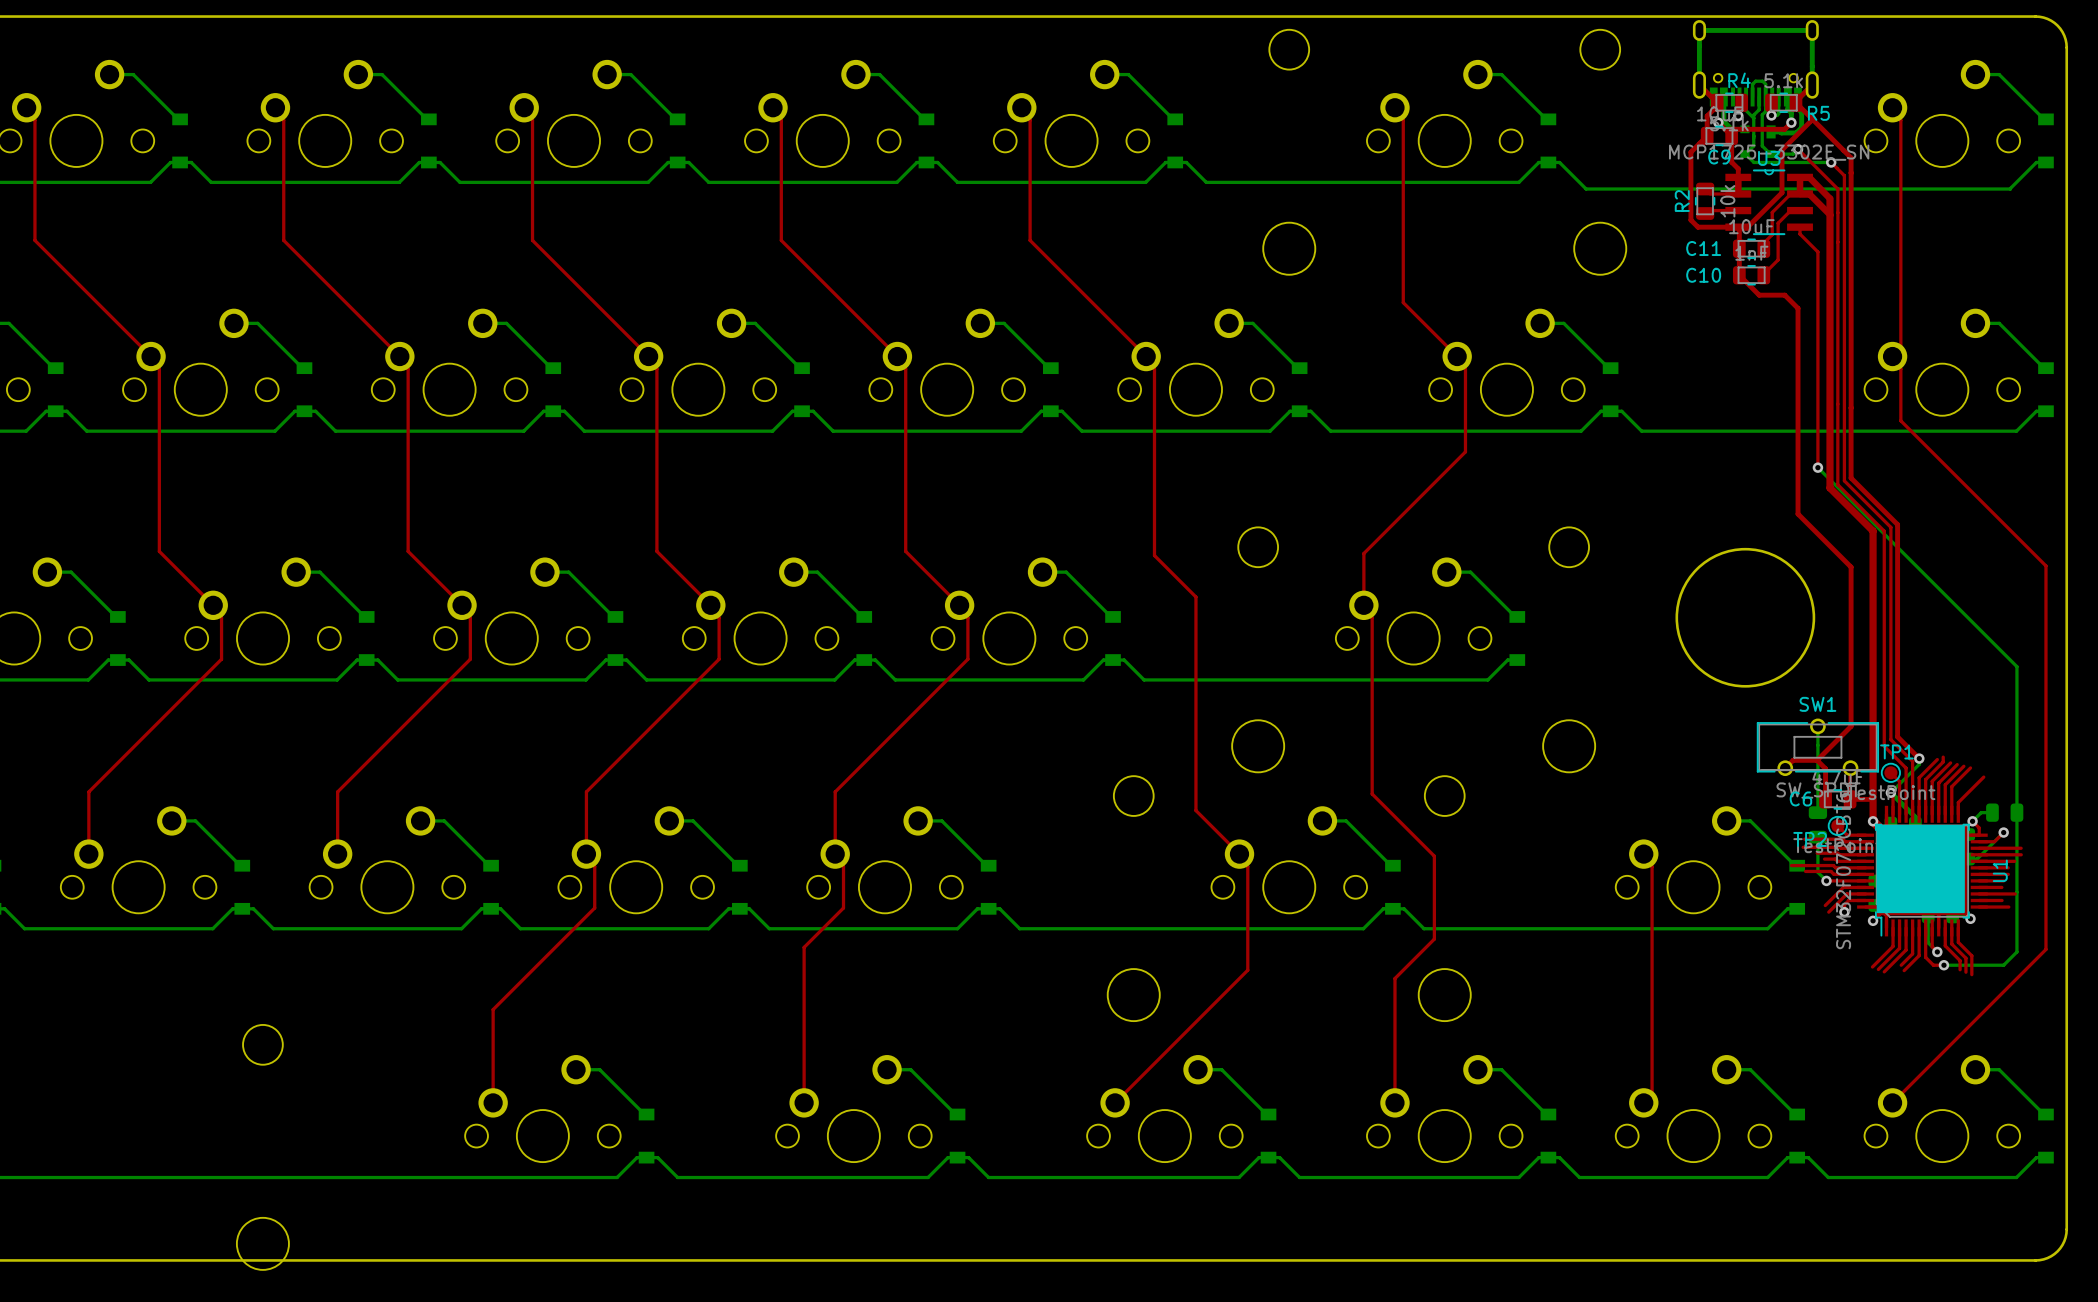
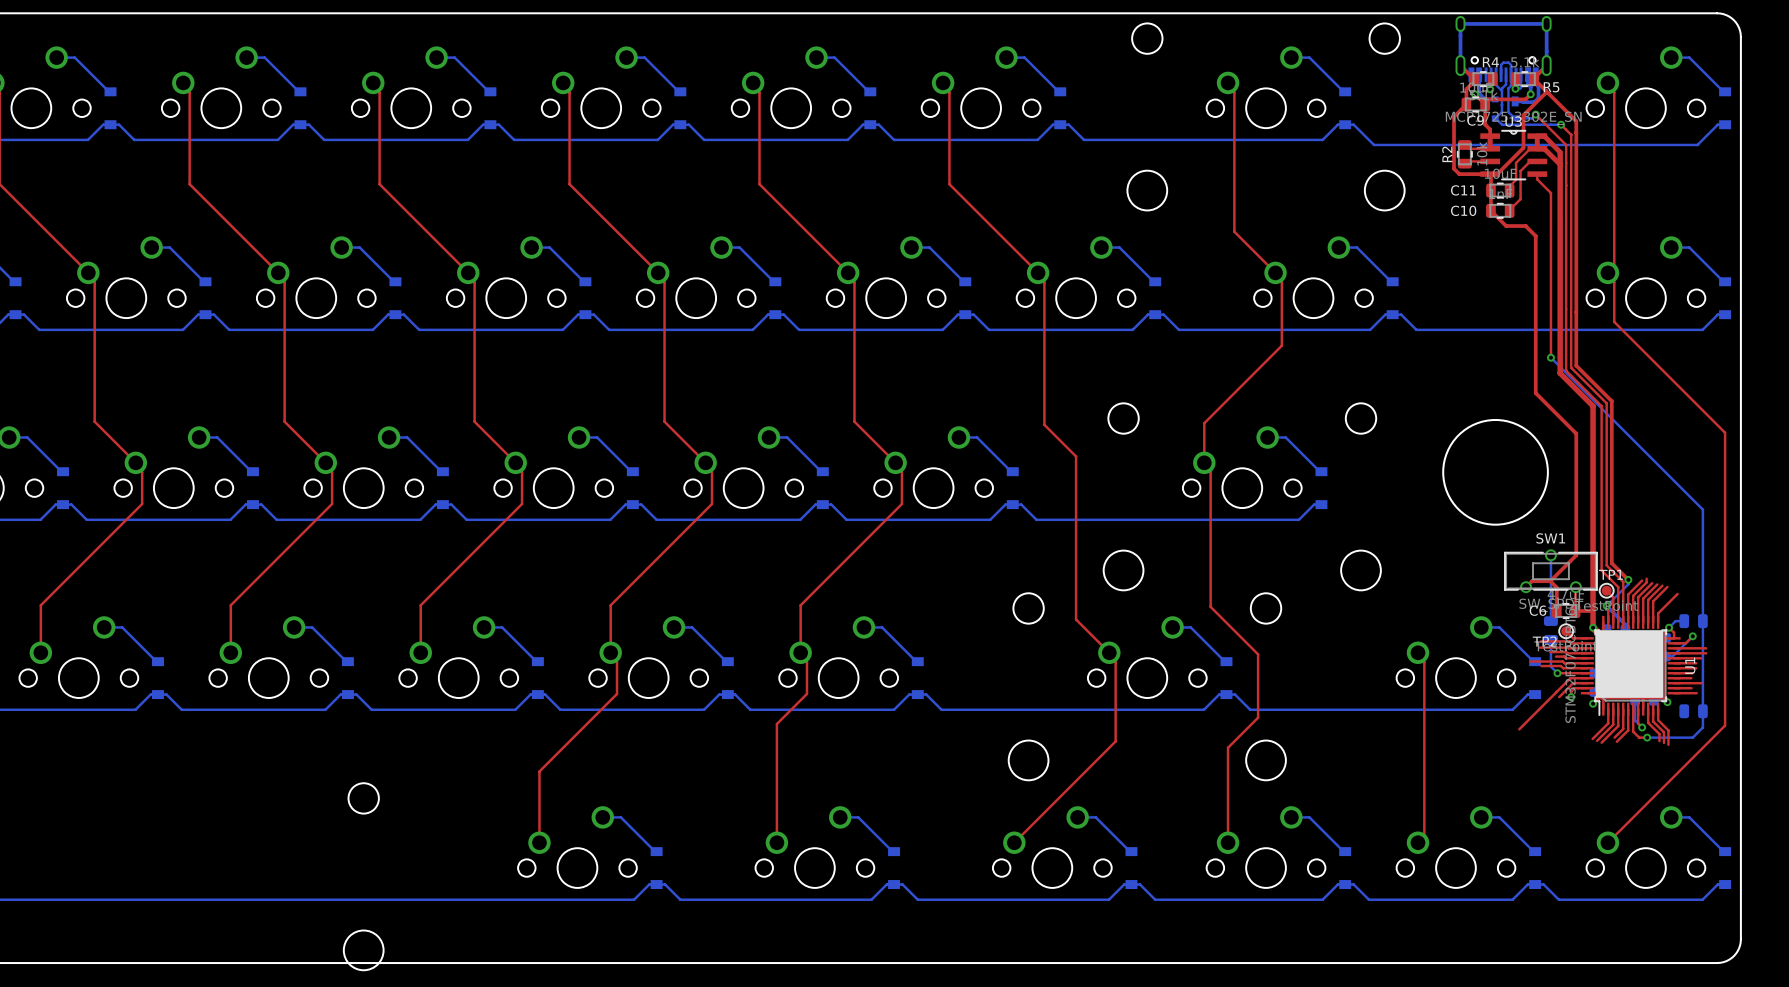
top track: none -> (1556, 692) (1519, 729)
part: none -> (1693, 711)

